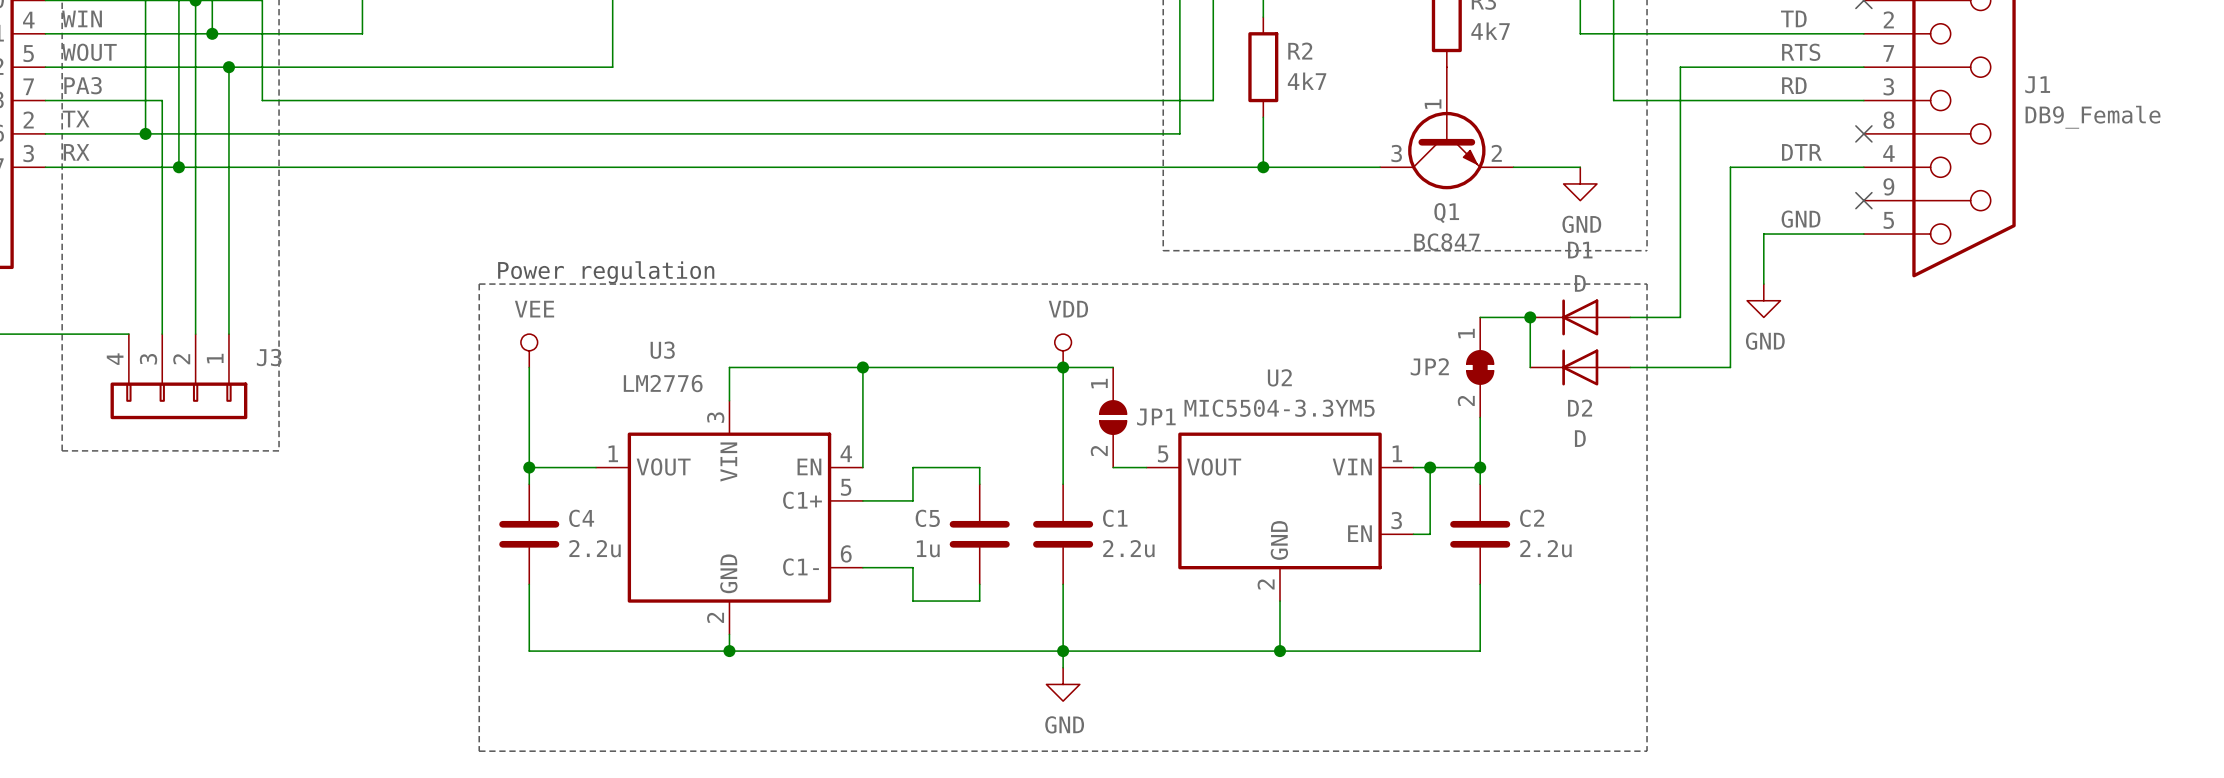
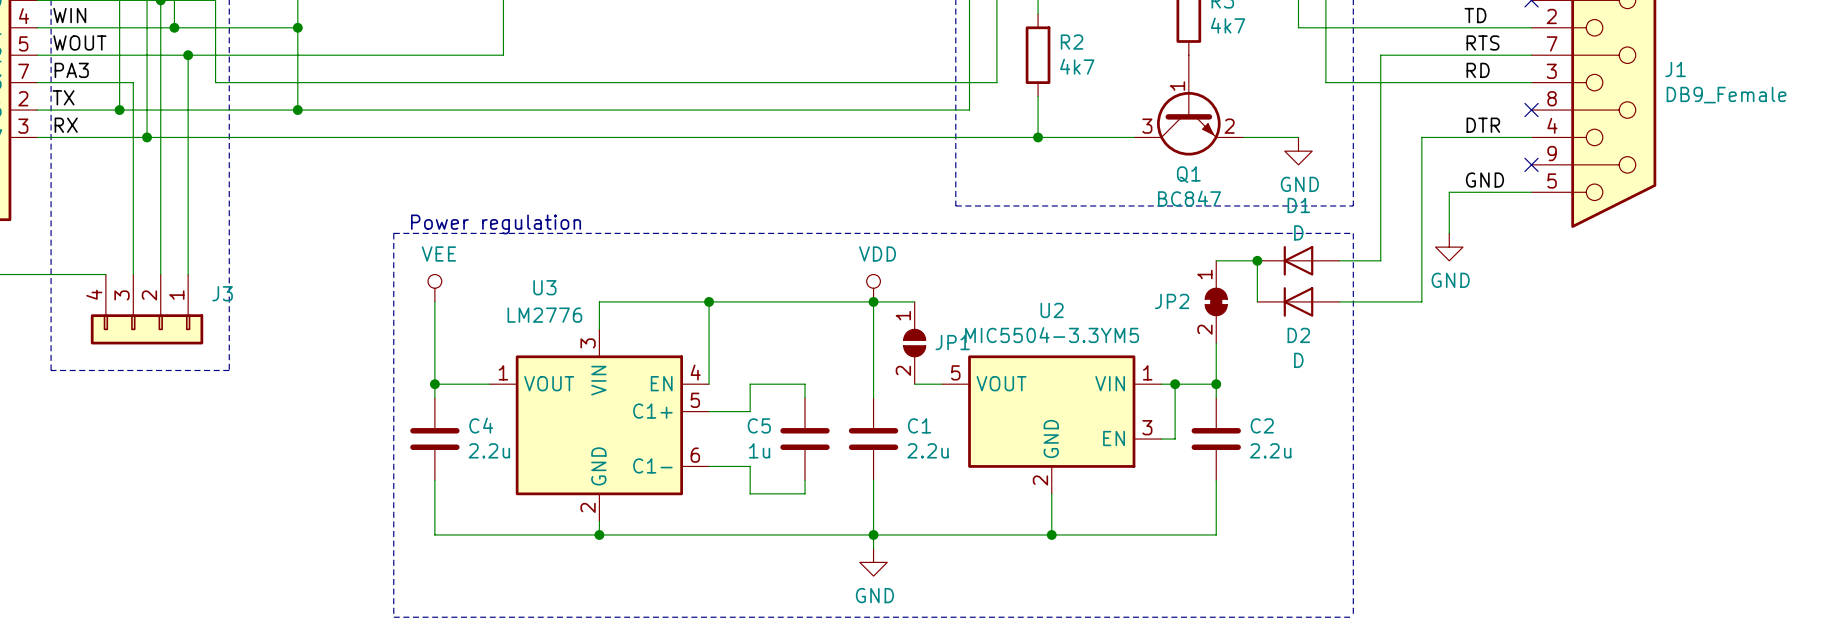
wire: none -> (297, 27) (297, 110)
junction: none -> (297, 27)
junction: none -> (297, 110)

